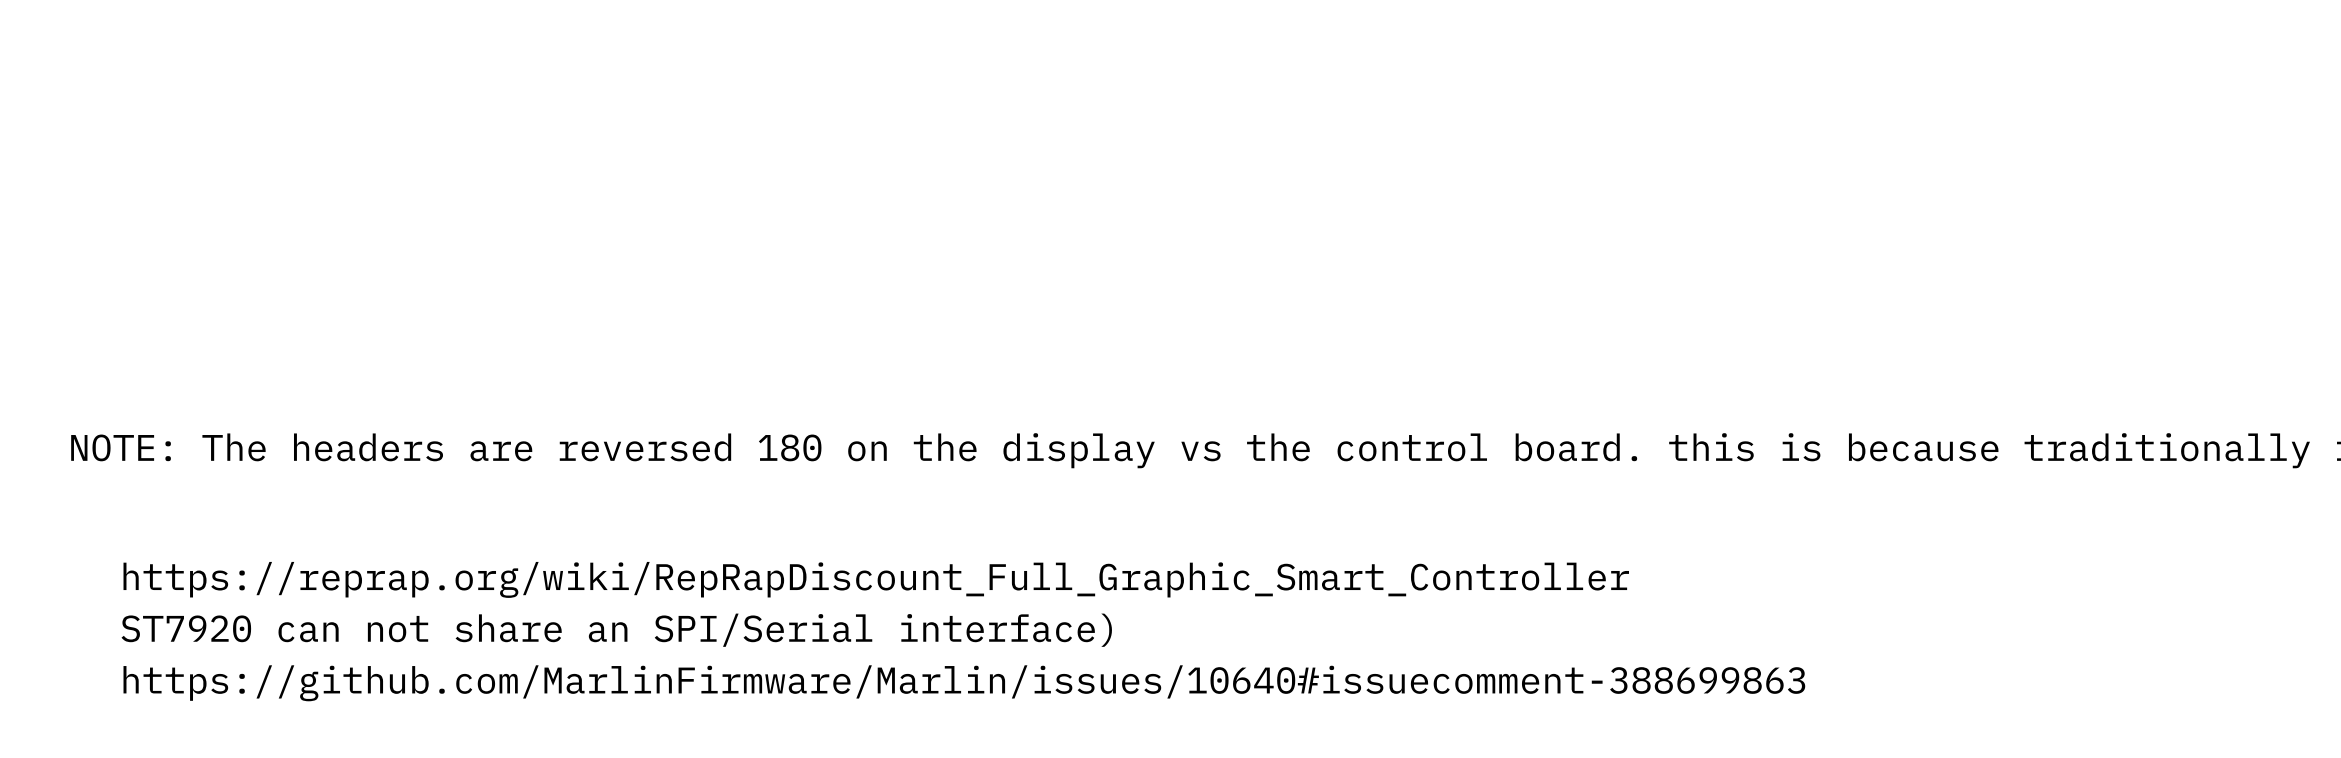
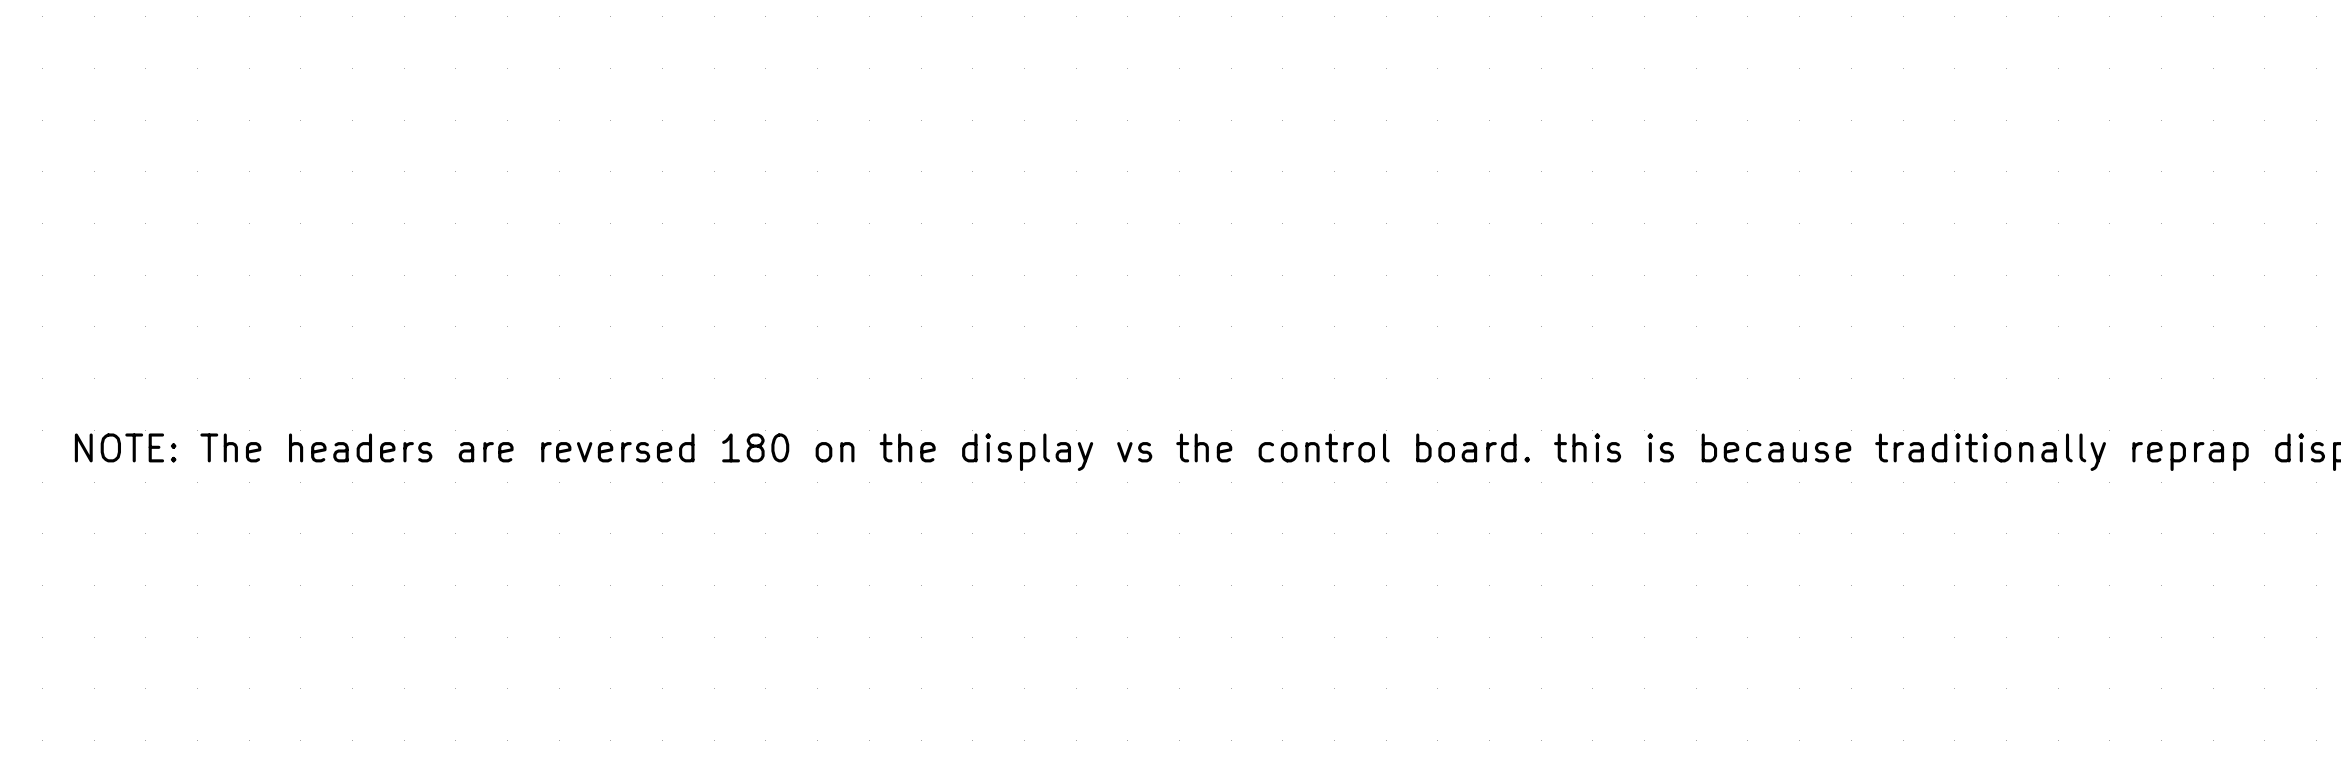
text: https://reprap.org/wiki/RepRapDiscount_Full_Graphic_Smart_Controller (876, 579) -> none
text: ST7920 can not share an SPI/Serial interface) (616, 630) -> none
text: https://github.com/MarlinFirmware/Marlin/issues/10640#issuecomment-388699863 (964, 683) -> none

